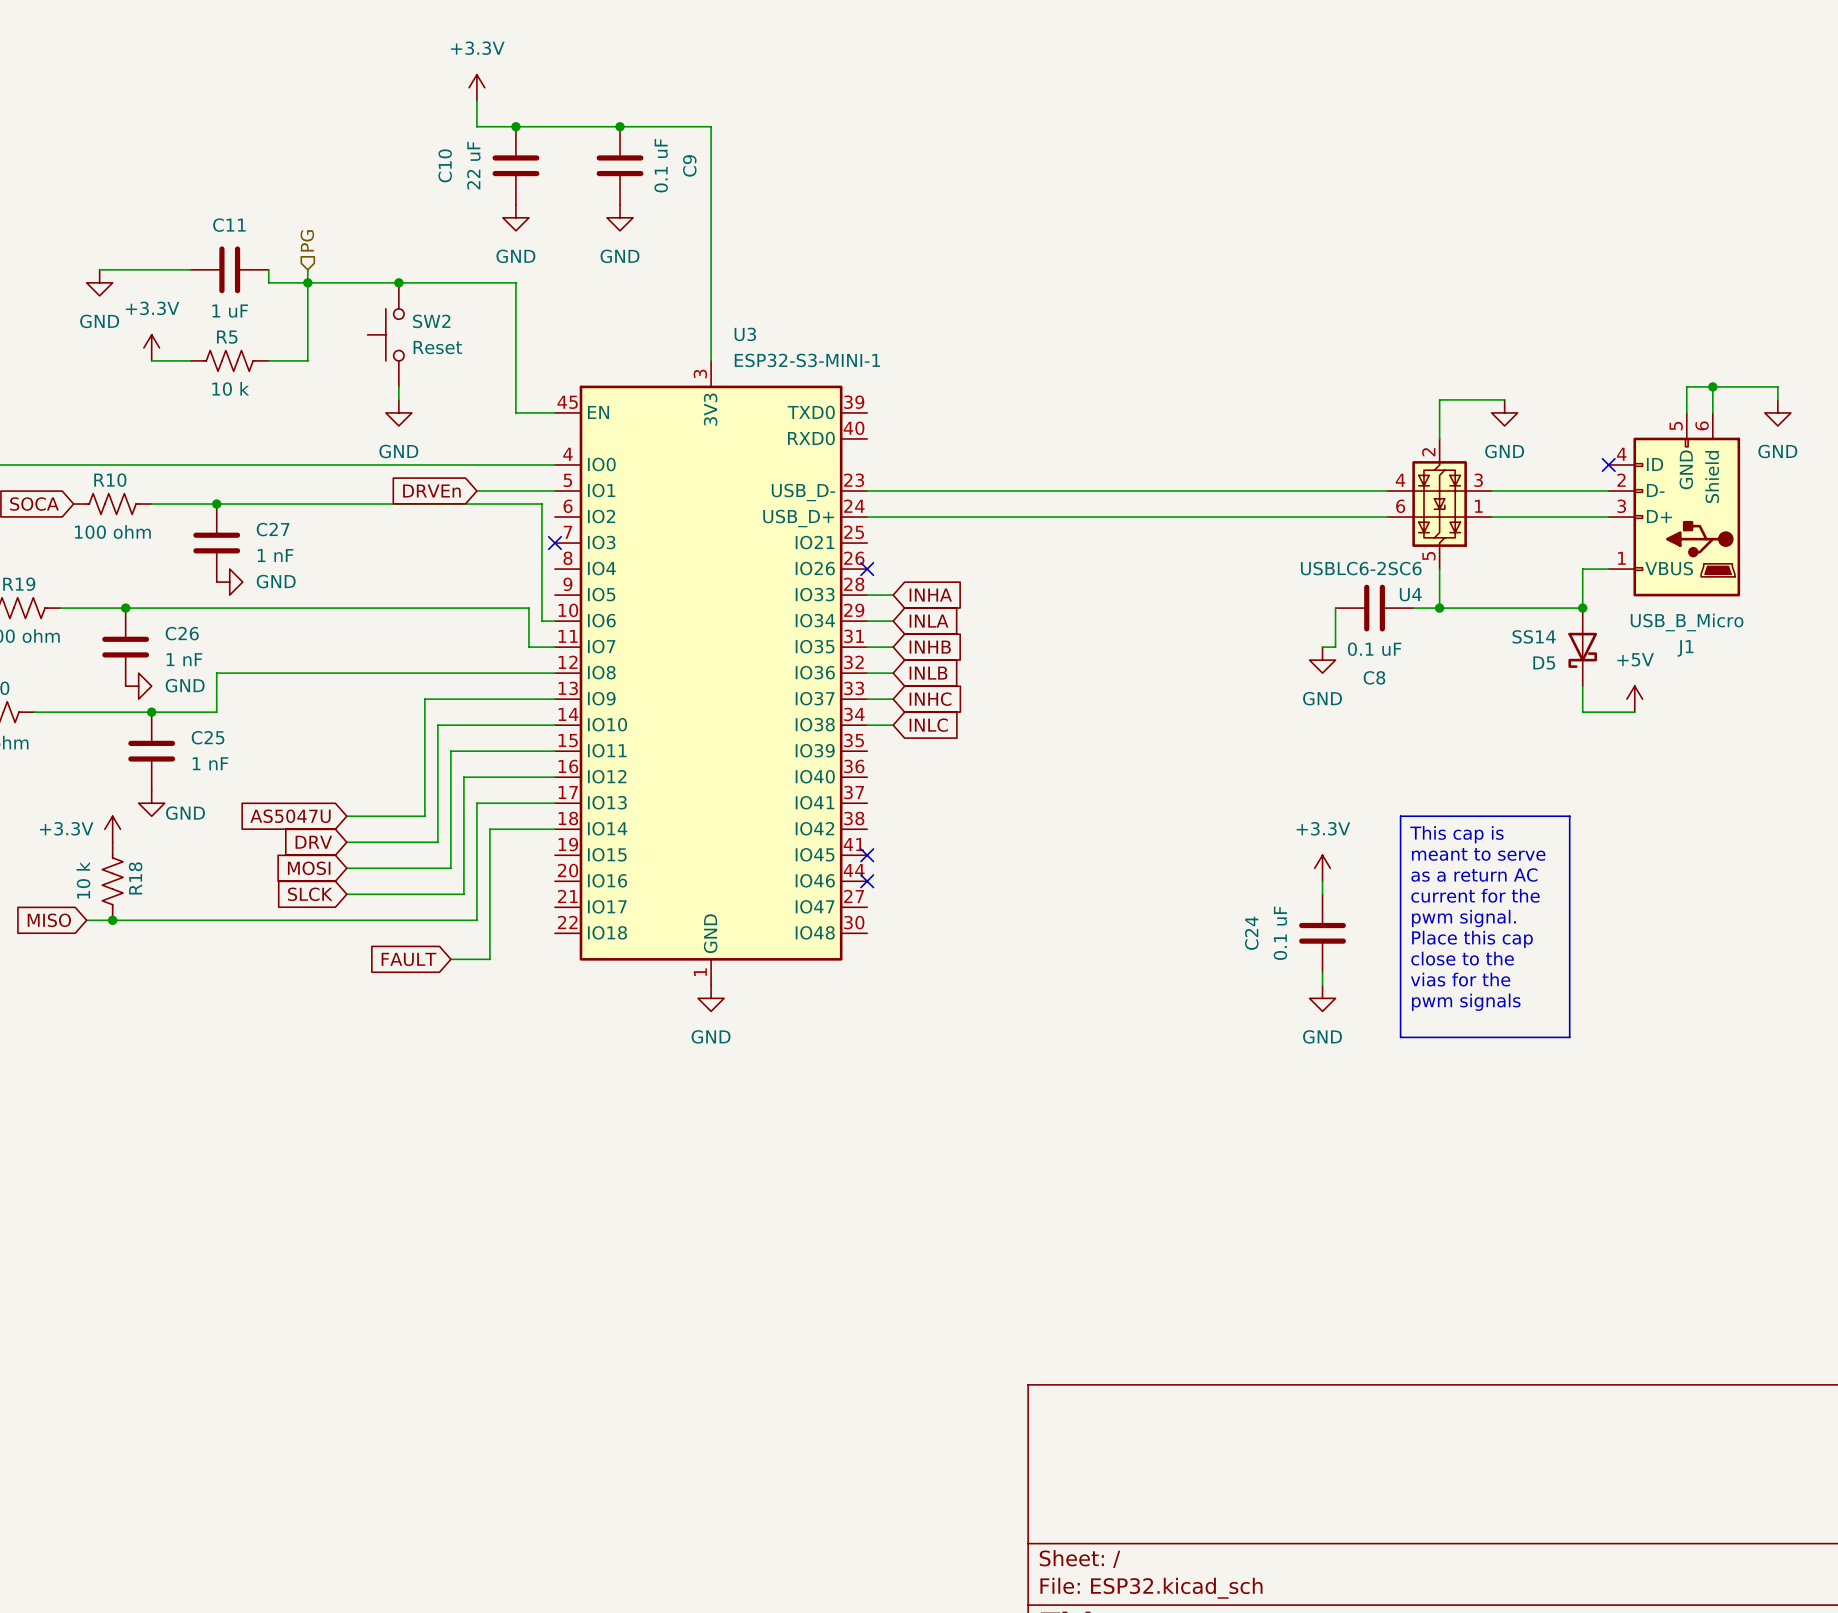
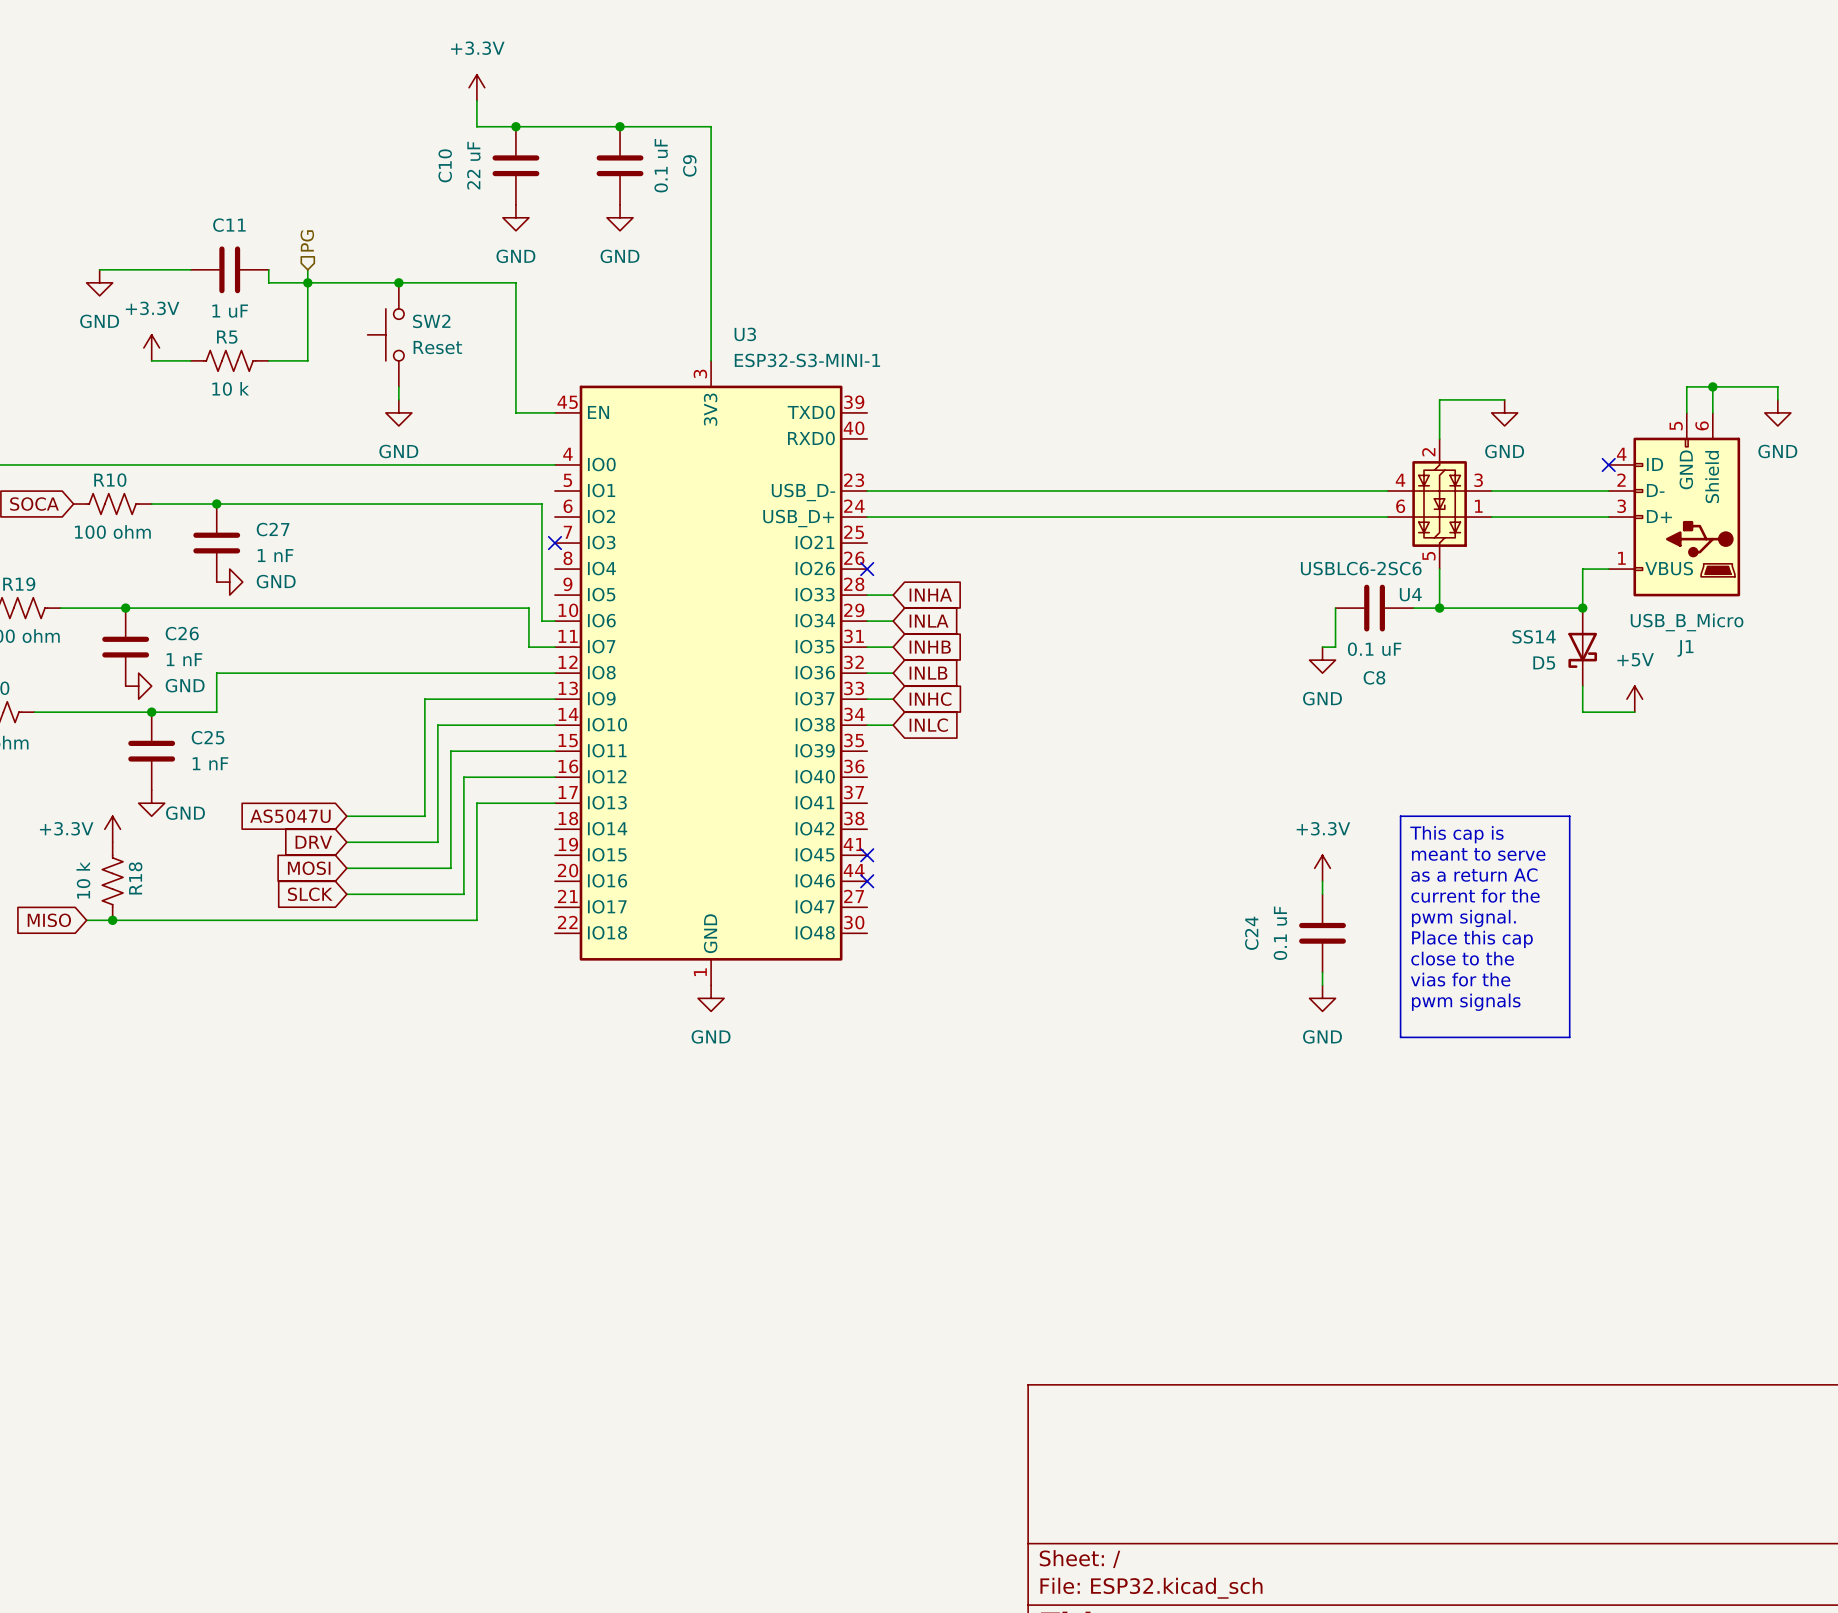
global label: DRVEn (431, 491) -> none
wire: (476, 491) (554, 491) -> none
wire: (554, 829) (489, 829) (489, 959) (450, 959) -> none
global label: FAULT (408, 959) -> none

